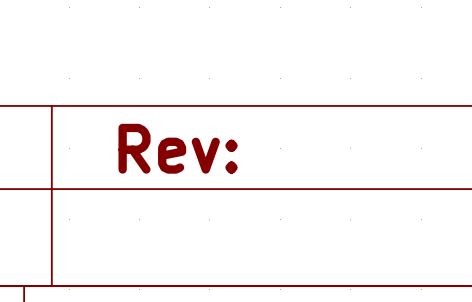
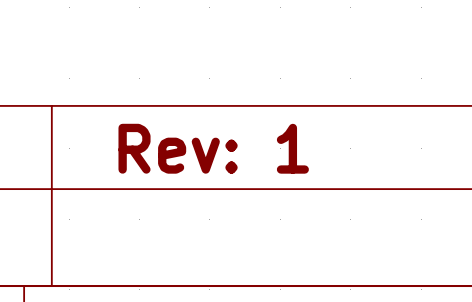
title block: Rev: (178, 148) -> Rev: 1 (213, 148)

